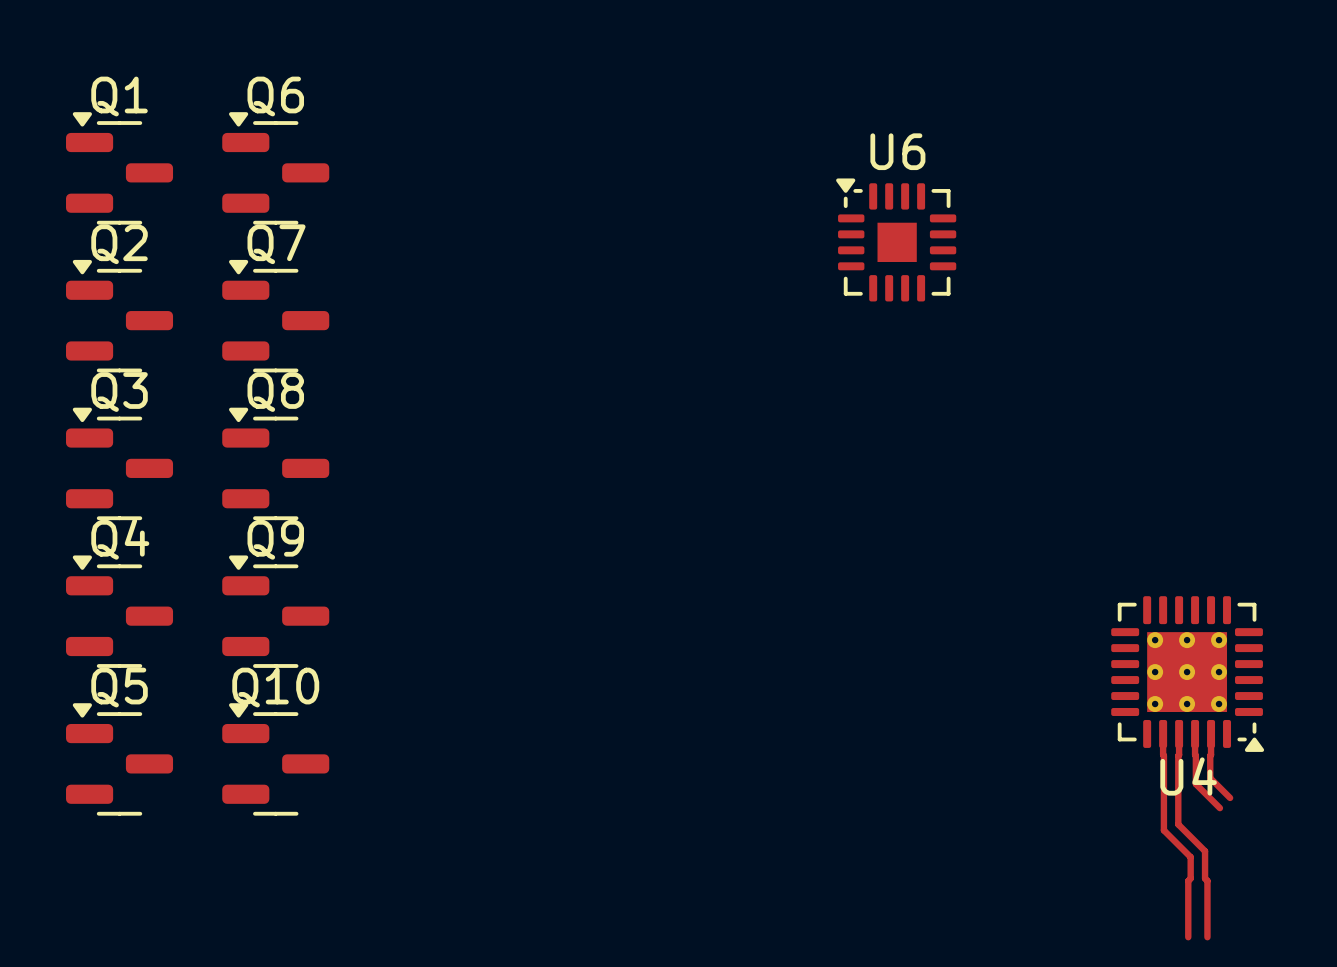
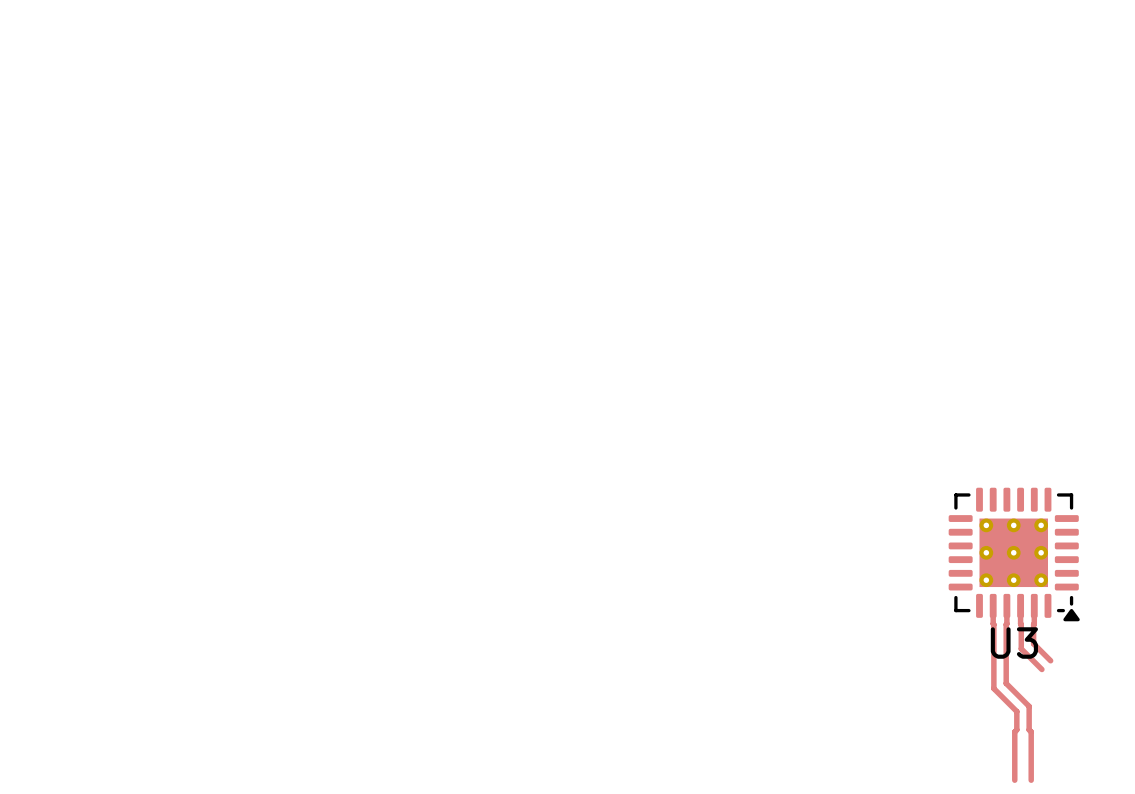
Q1: (119, 168) -> none
Q6: (275, 168) -> none
U6: (896, 239) -> none
Q2: (119, 316) -> none
Q7: (275, 316) -> none
Q3: (119, 463) -> none
Q8: (275, 463) -> none
Q4: (119, 611) -> none
Q9: (275, 611) -> none
Q5: (119, 759) -> none
Q10: (275, 759) -> none
U4 name: U4 (1188, 776) -> U3 (1014, 643)

